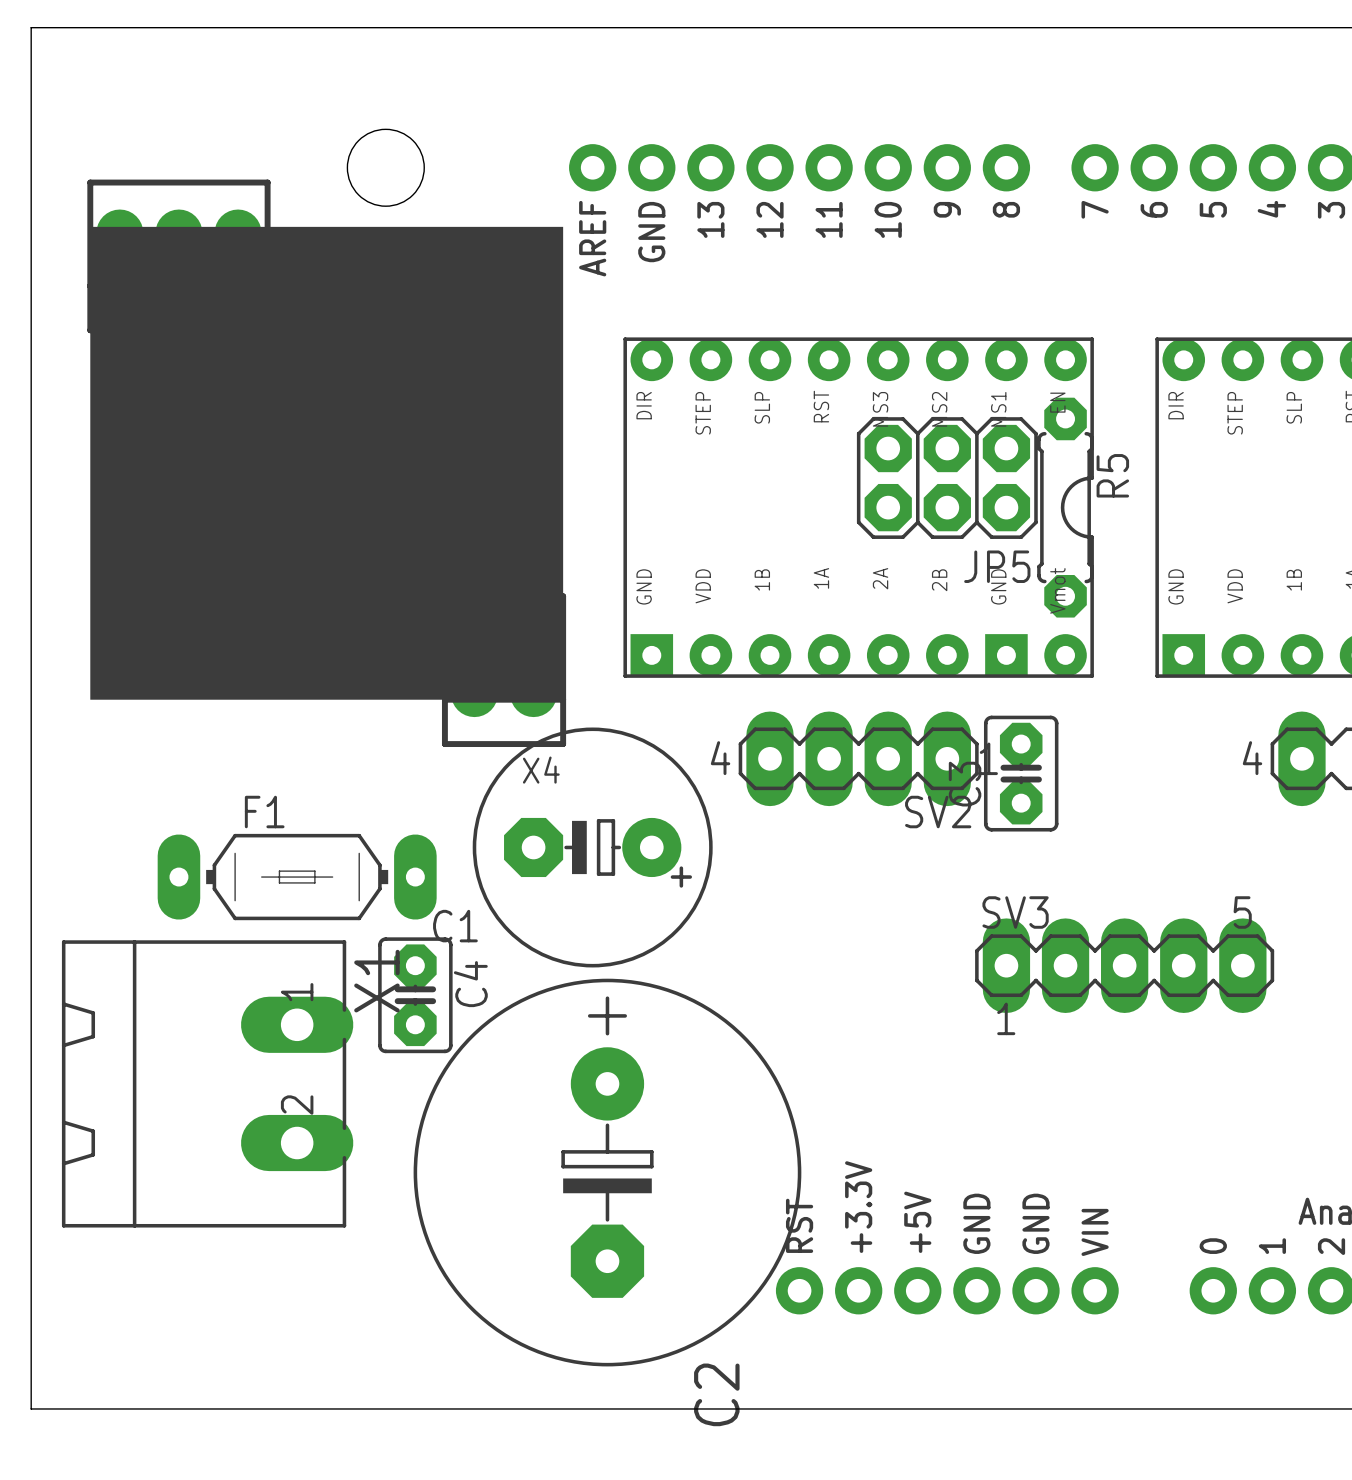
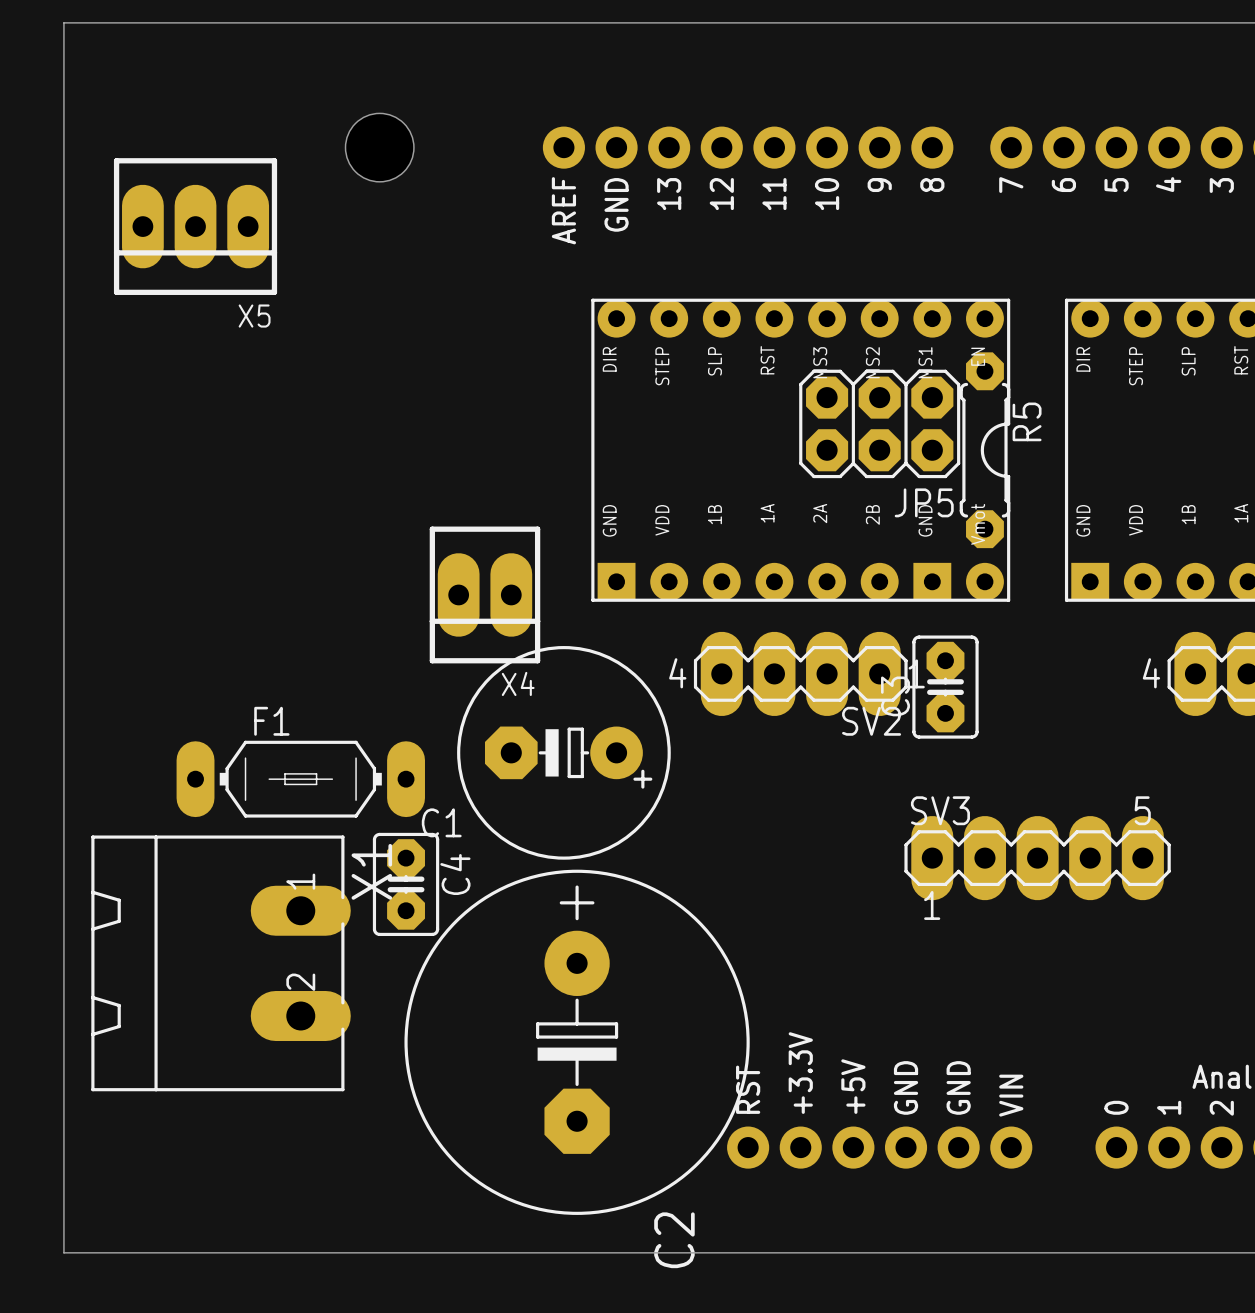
drawing: [90, 226, 564, 700] -> none

